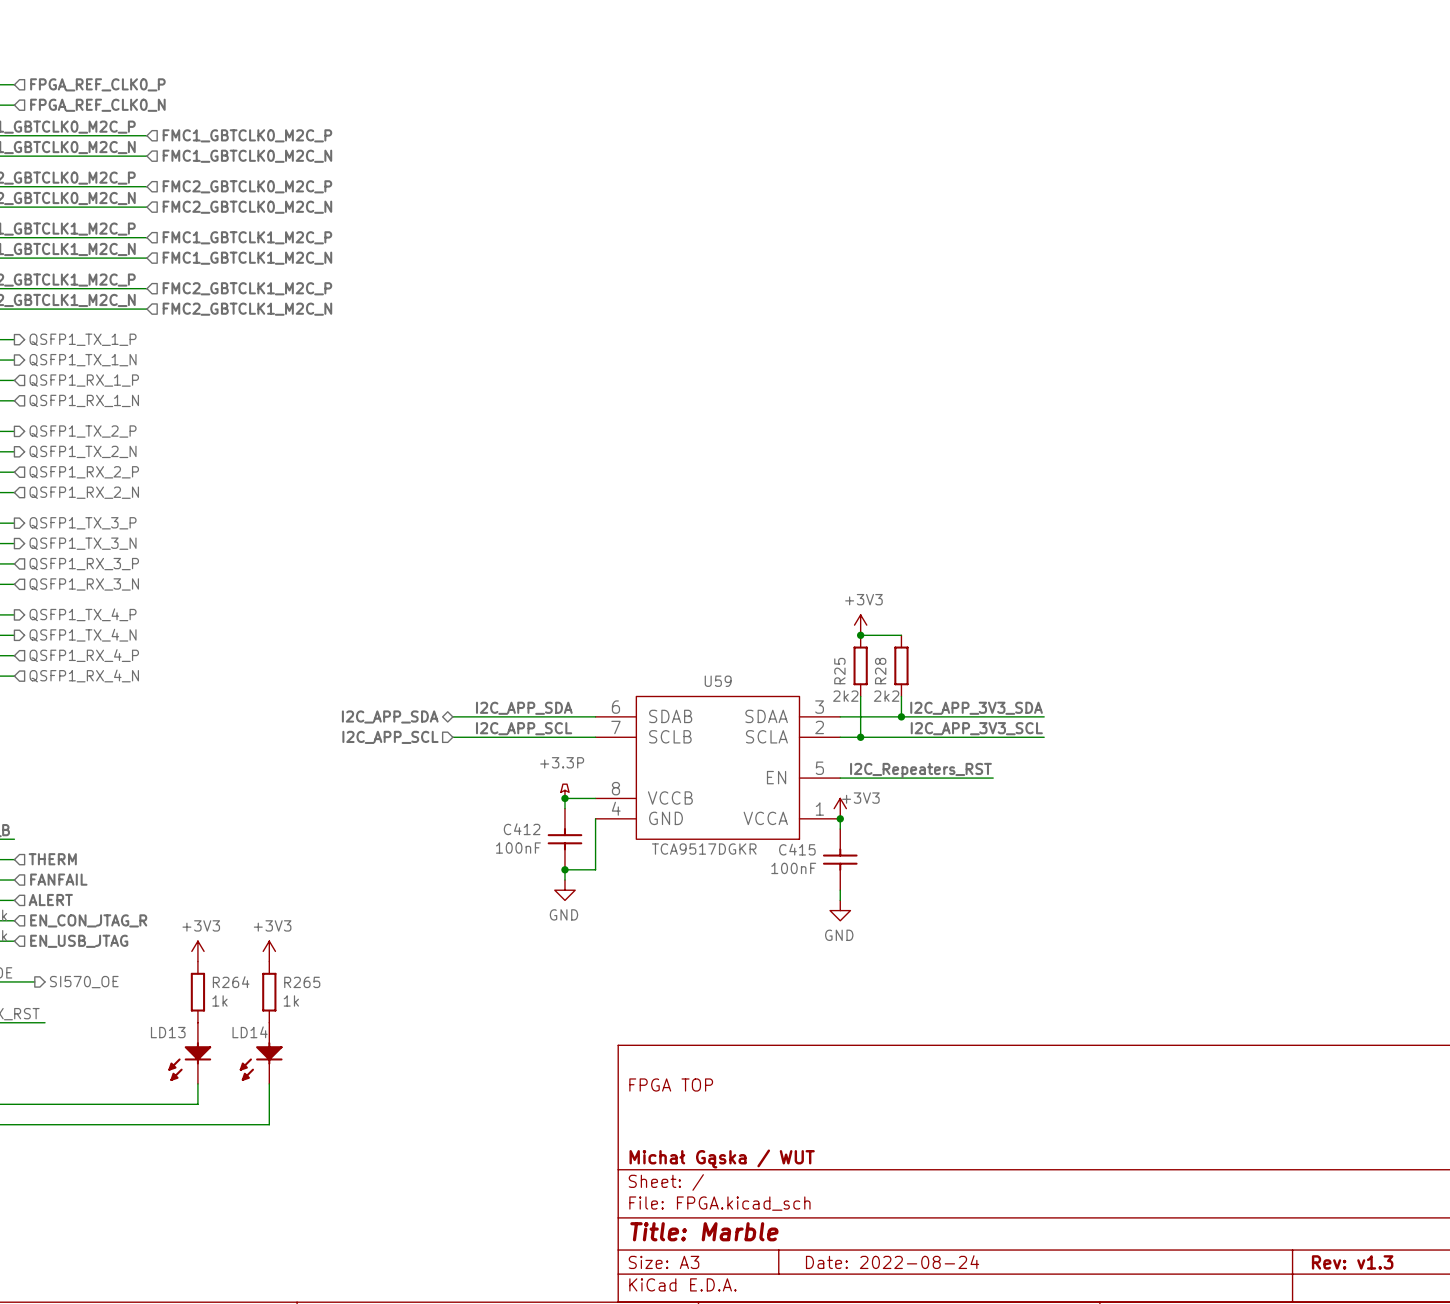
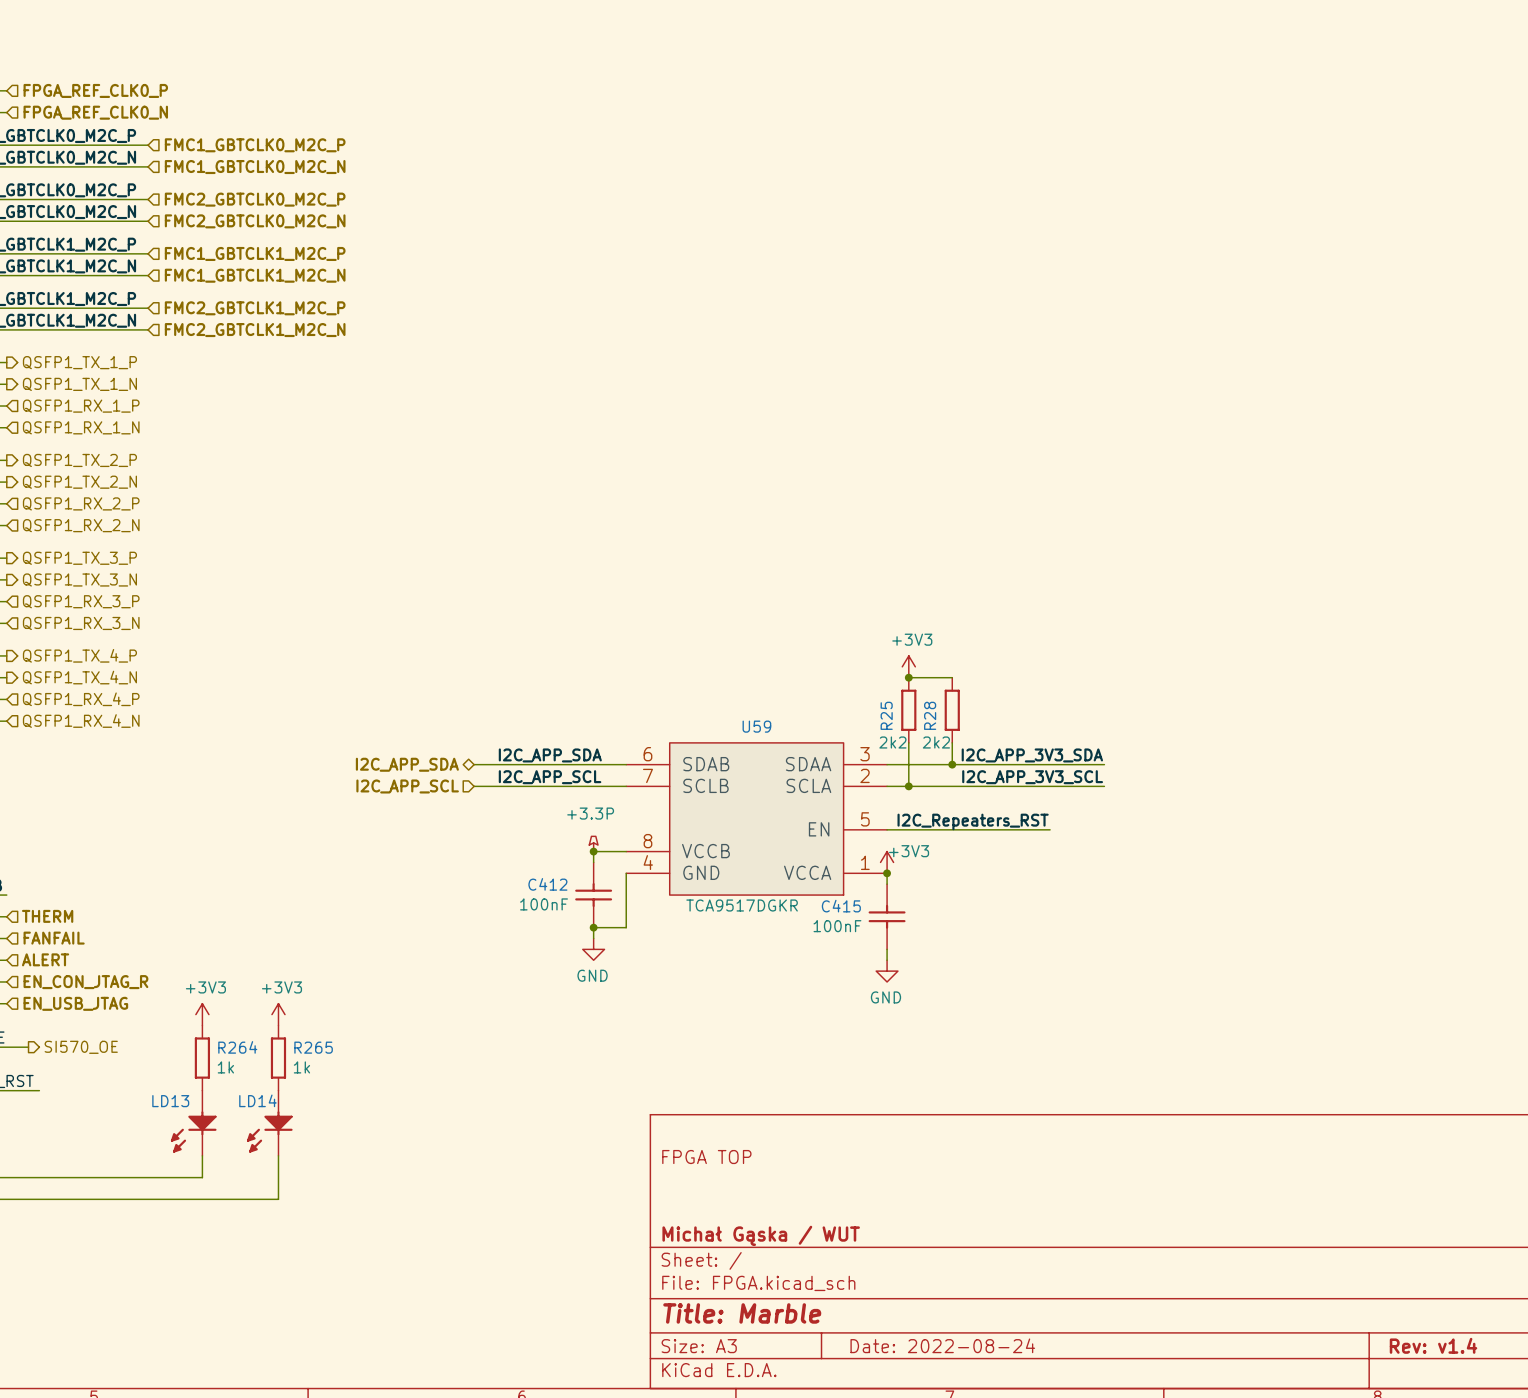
title block: Rev: v1.3 (1352, 1262) -> Rev: v1.4 (1433, 1345)

